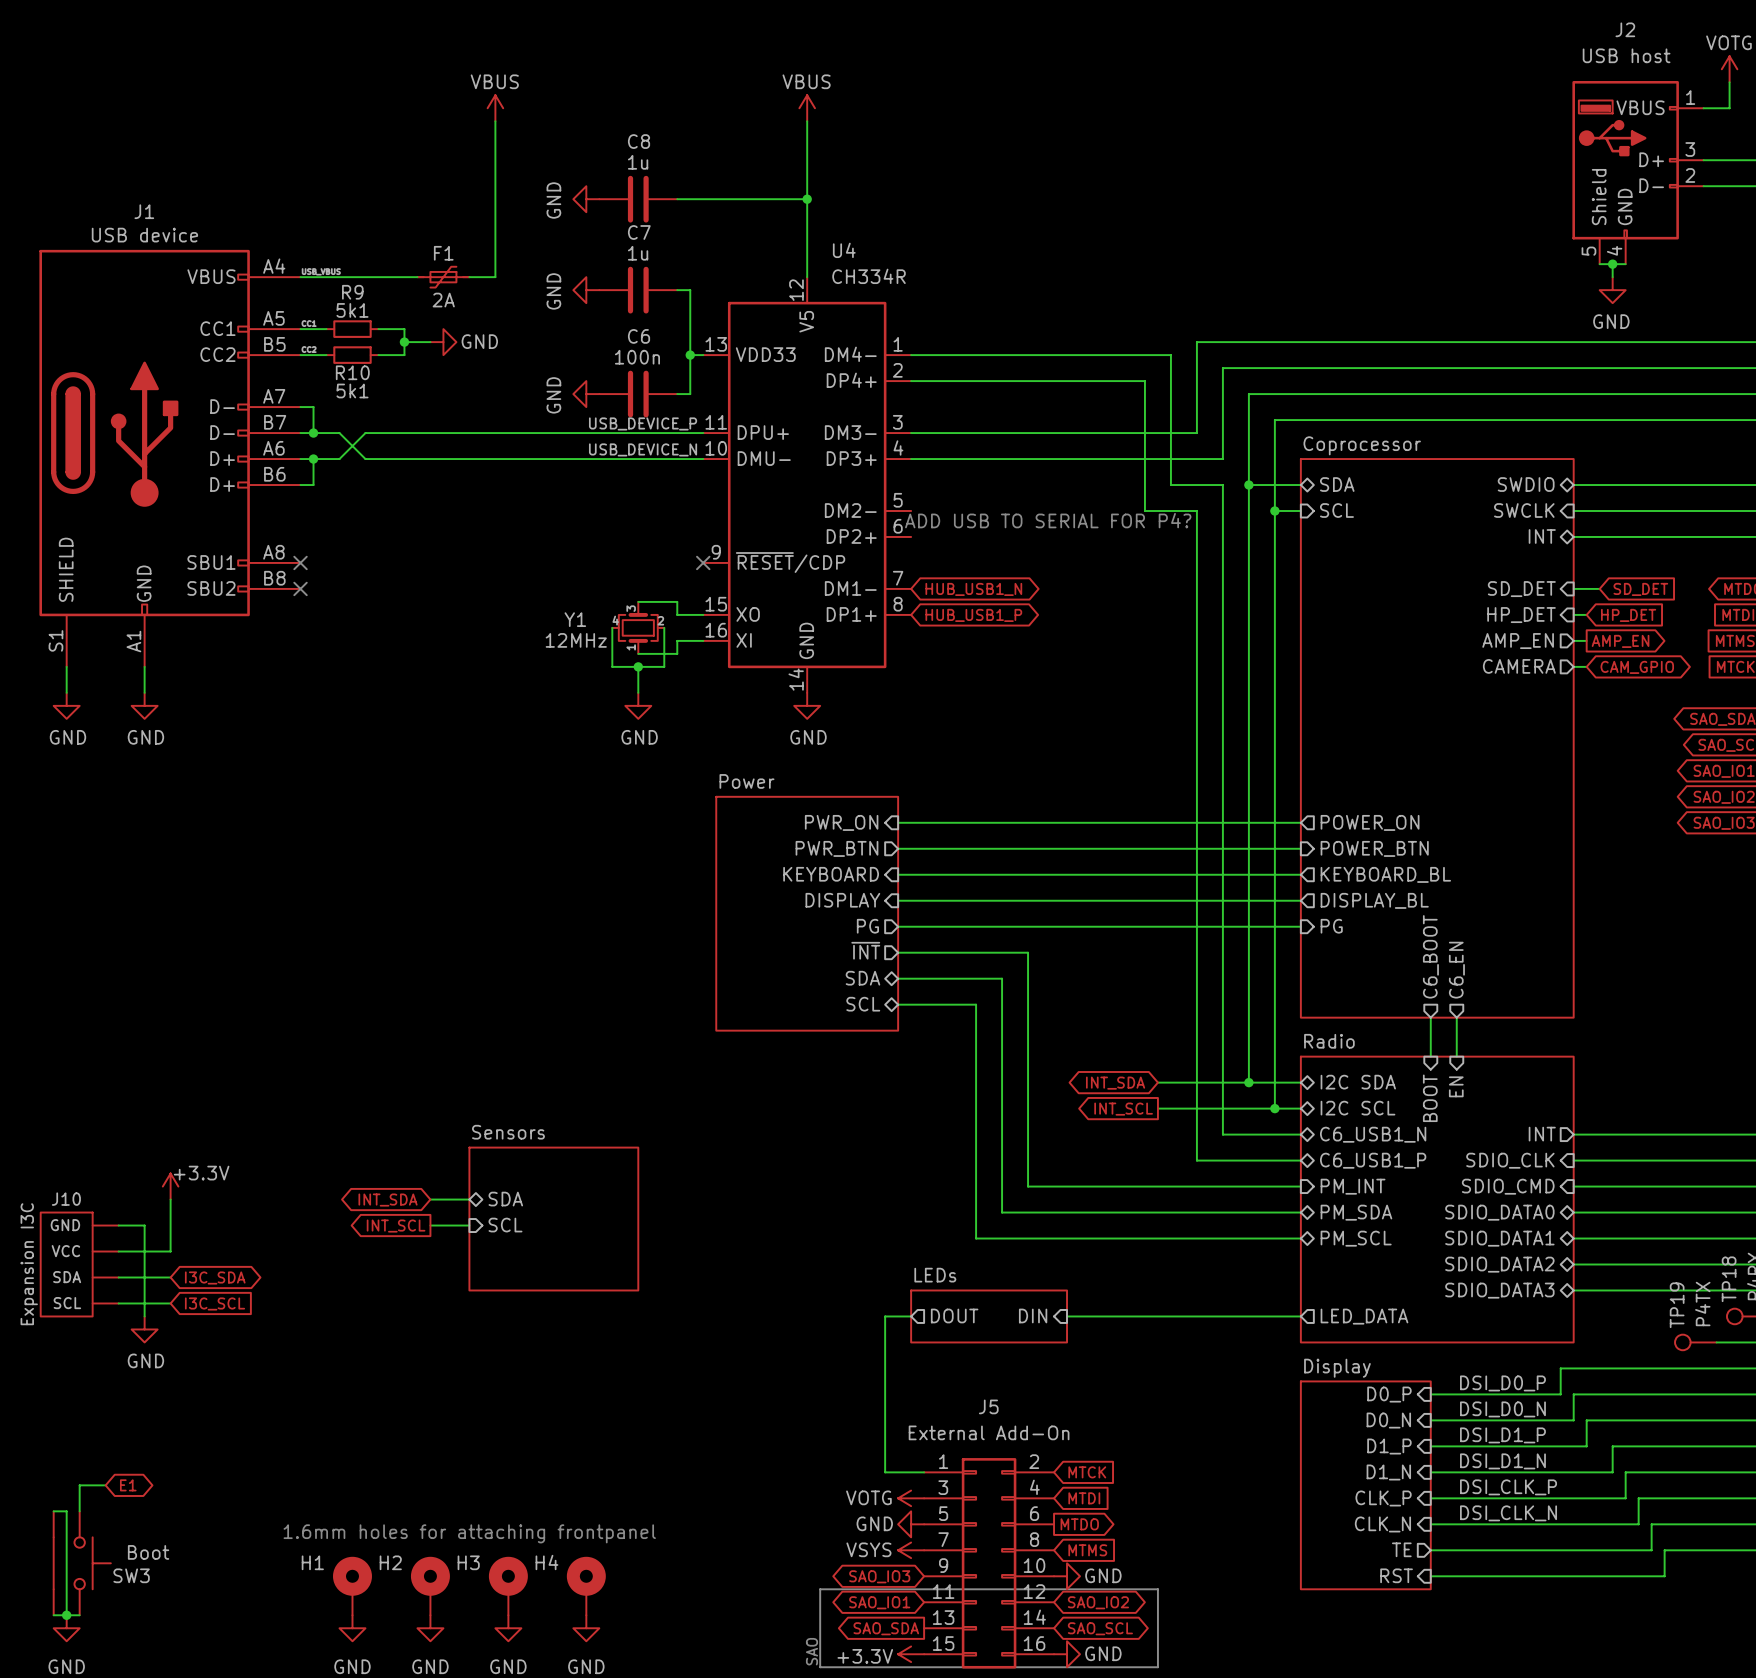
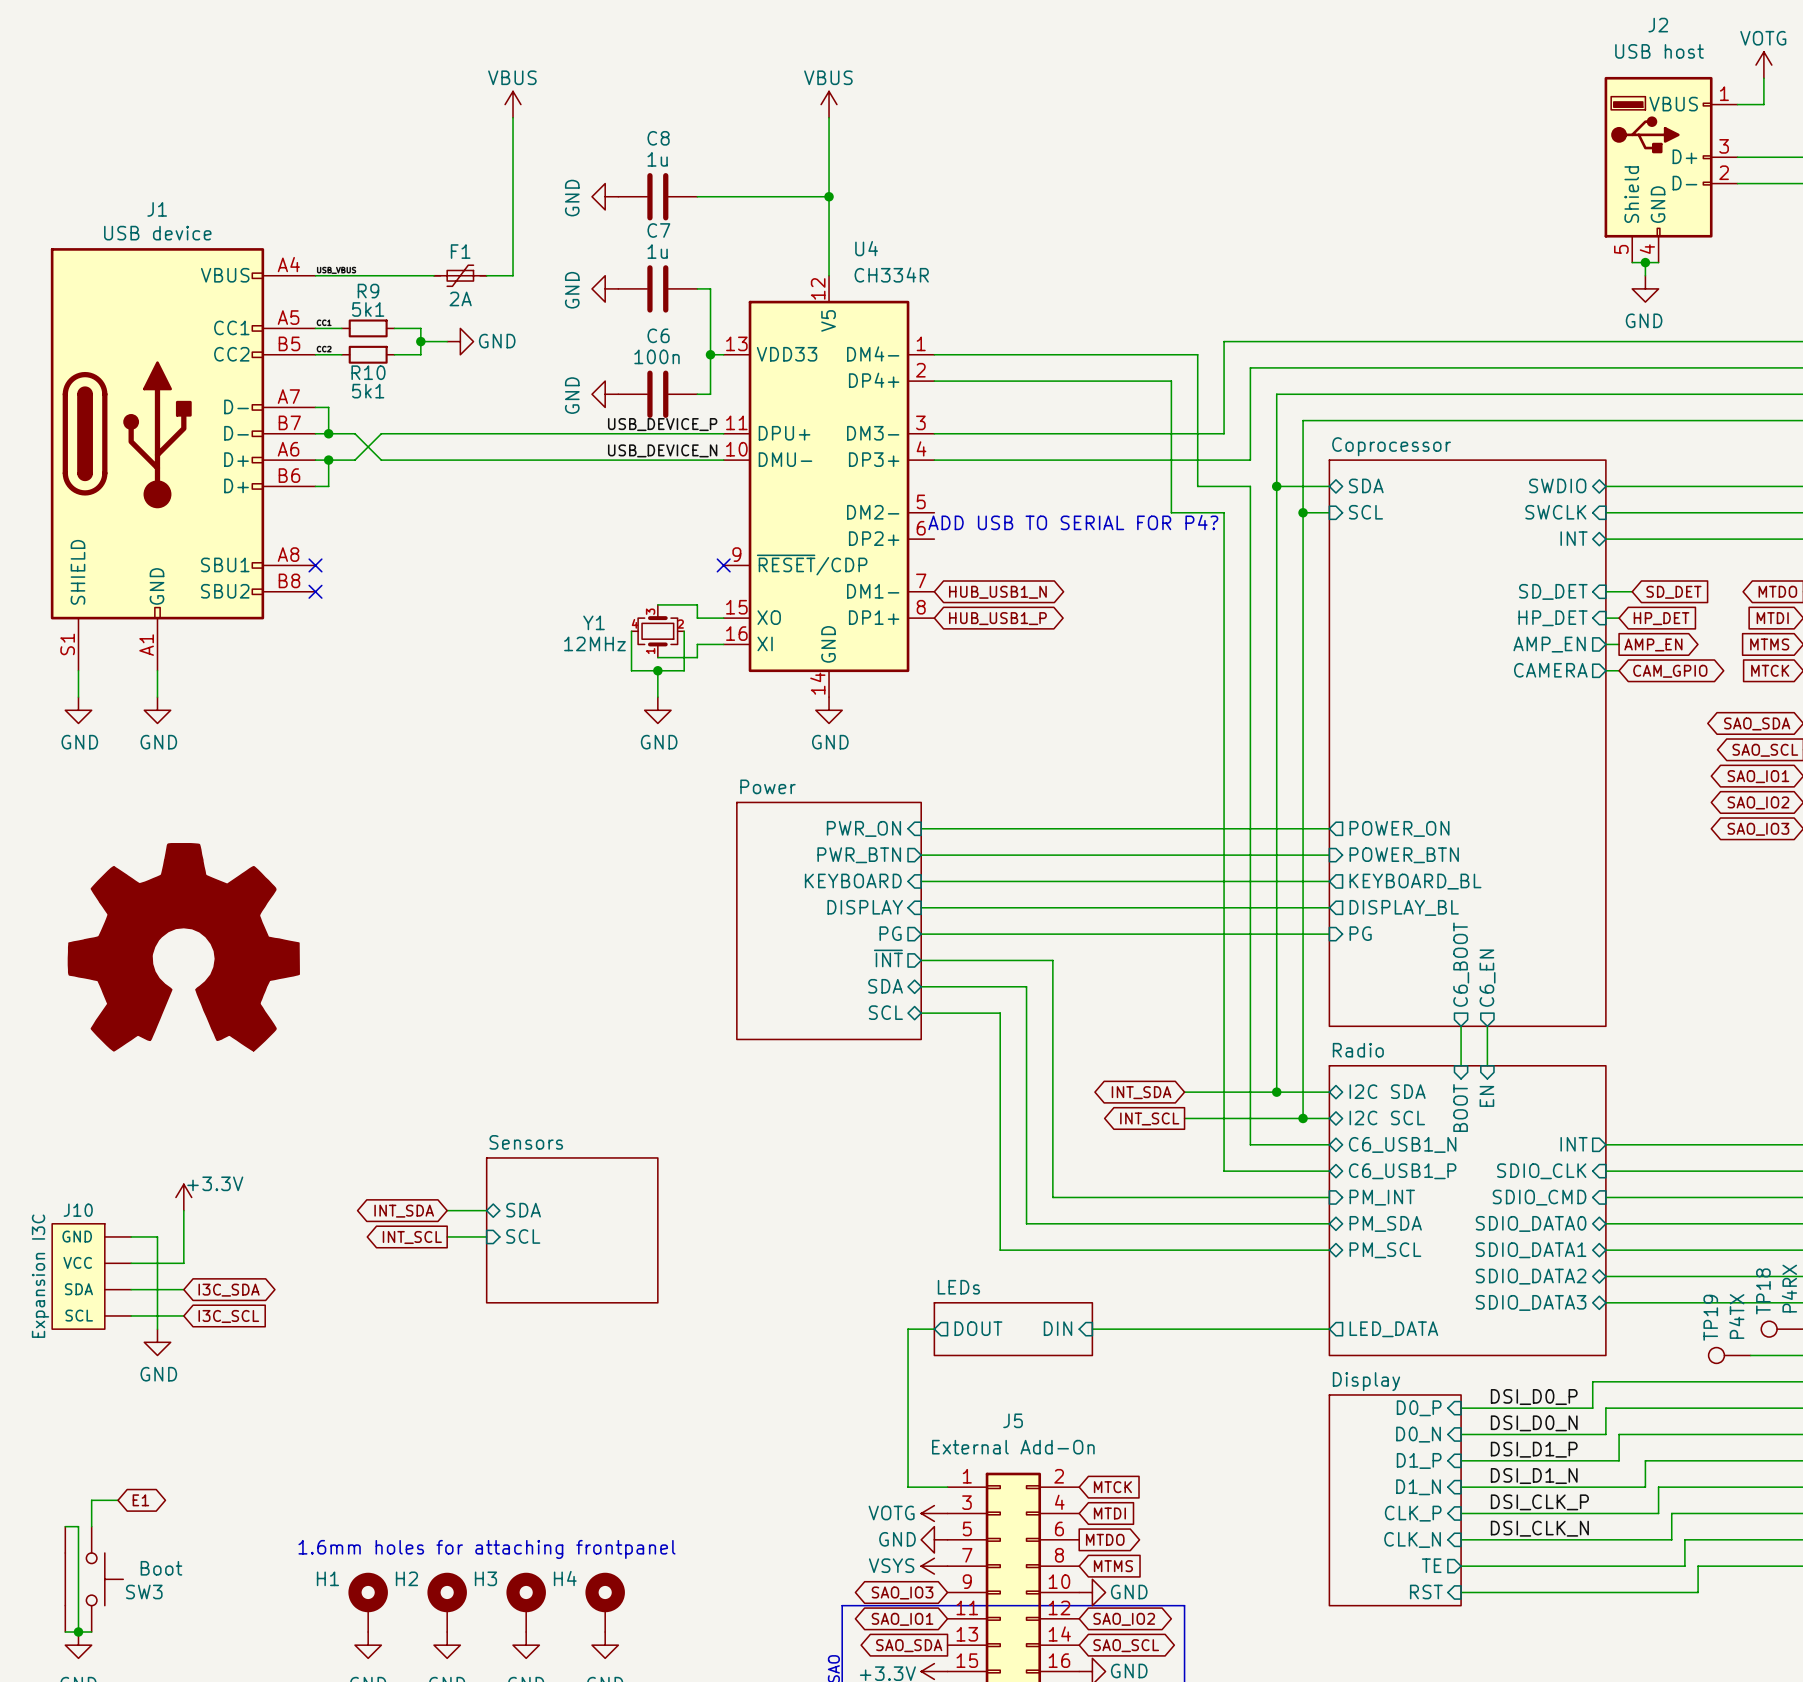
part: none -> (183, 947)

